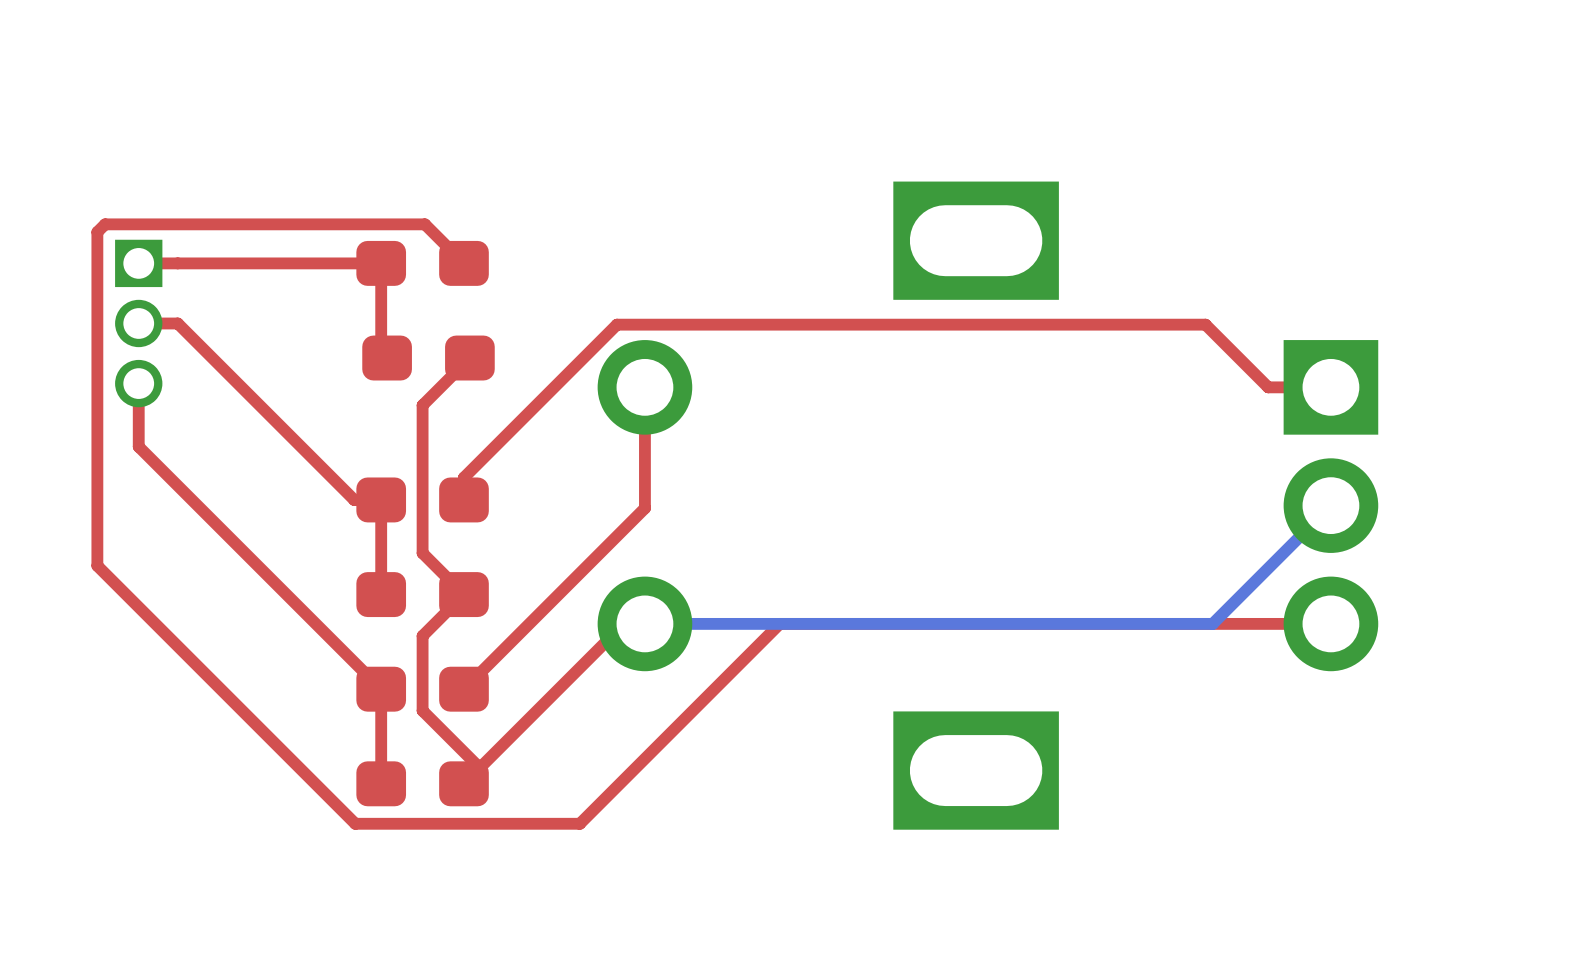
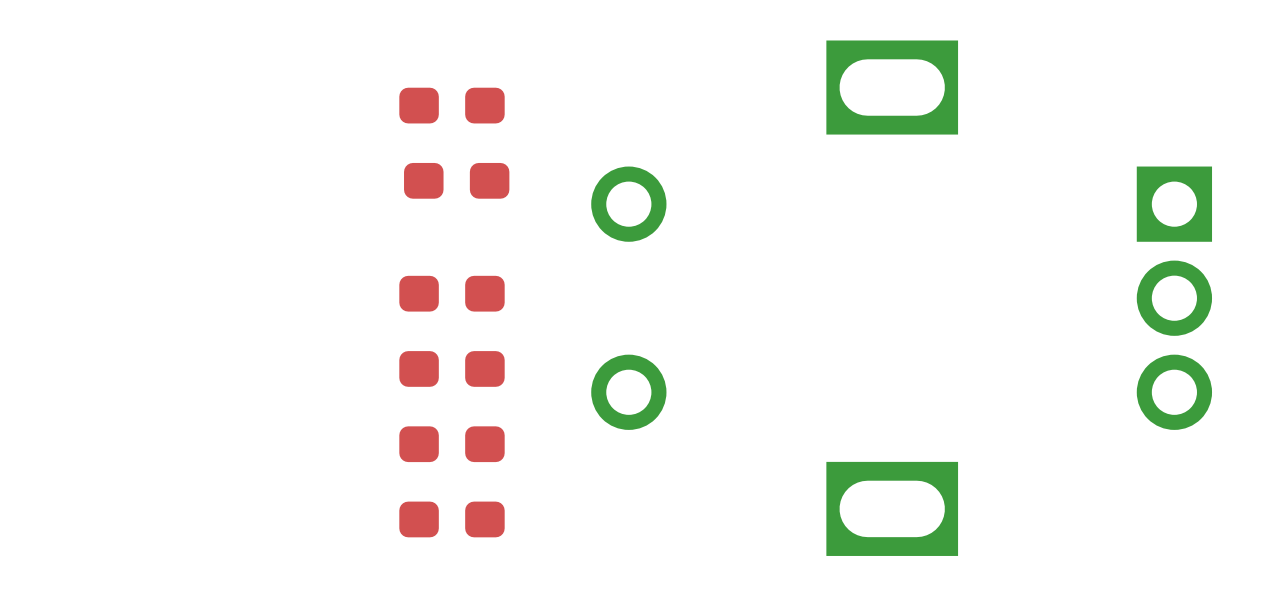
top track: (138, 263) (381, 263) (381, 352) (387, 358) -> none
top track: (463, 263) (424, 224) (105, 224) (97, 232) (97, 565) (355, 823) (579, 823) (779, 623) (1330, 623) -> none
top track: (138, 323) (177, 323) (354, 499) (381, 499) (381, 594) -> none
part: (138, 323) -> none
top track: (469, 358) (422, 405) (422, 553) (463, 594) (422, 635) (422, 710) (479, 767) -> none
top track: (138, 383) (138, 446) (381, 689) (381, 783) -> none
top track: (644, 387) (644, 508) (463, 689) -> none
top track: (1330, 387) (1268, 387) (1205, 324) (616, 324) (463, 477) (463, 499) -> none
bottom track: (1330, 505) (1212, 623) (644, 623) -> none
top track: (644, 623) (623, 623) (463, 783) -> none

